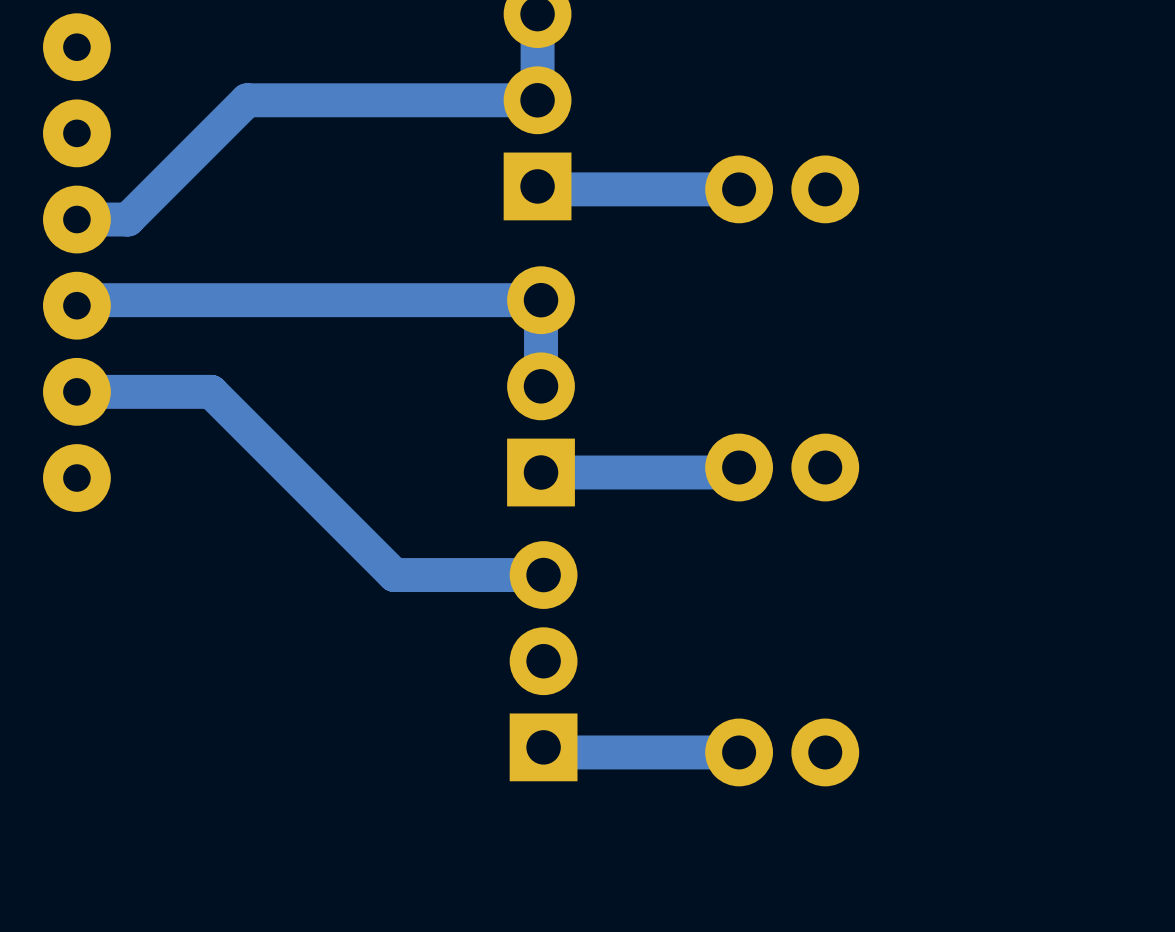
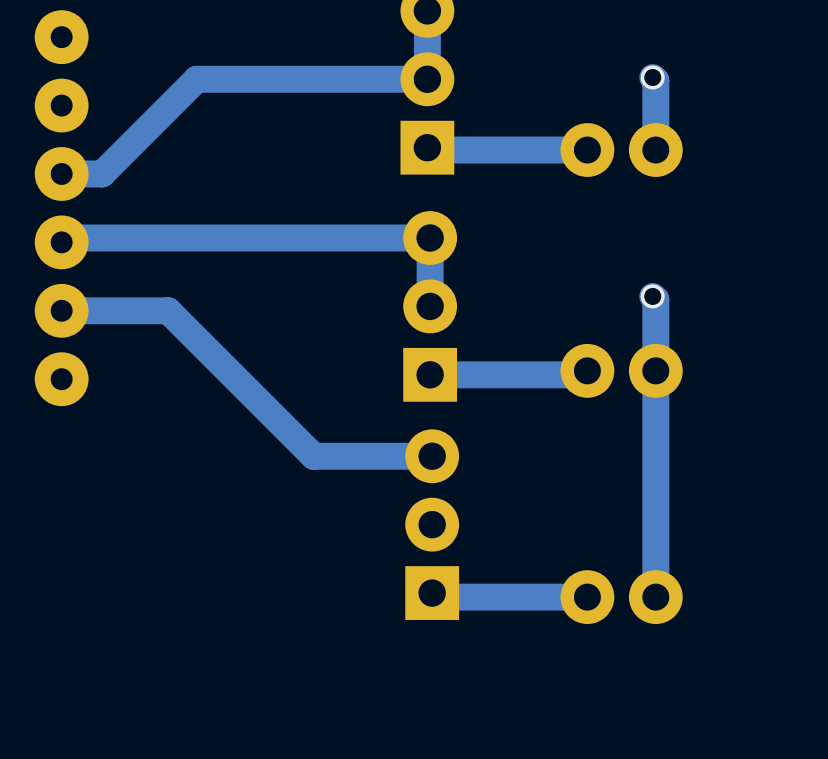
track: none -> (652, 77) (655, 80) (655, 150)
via: none -> (652, 77)
track: none -> (652, 296) (655, 299) (655, 597)
via: none -> (652, 296)

